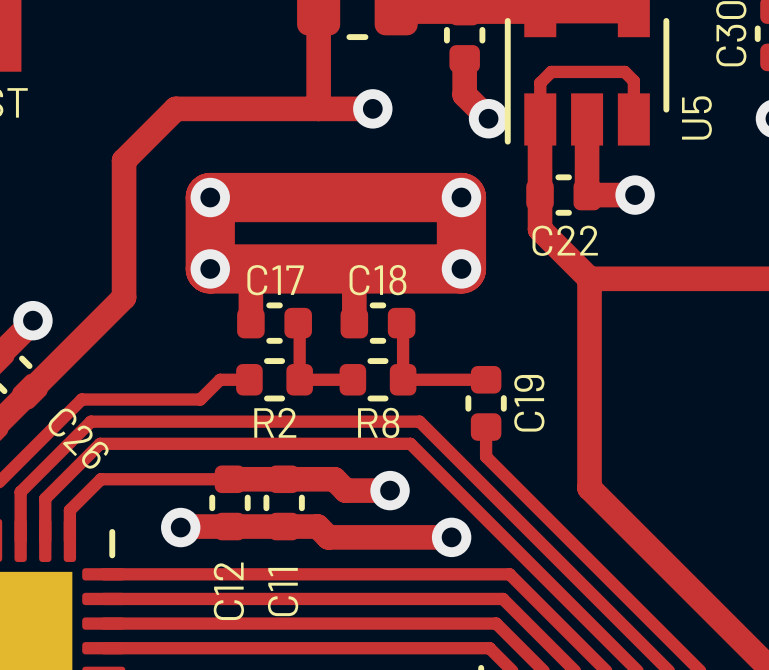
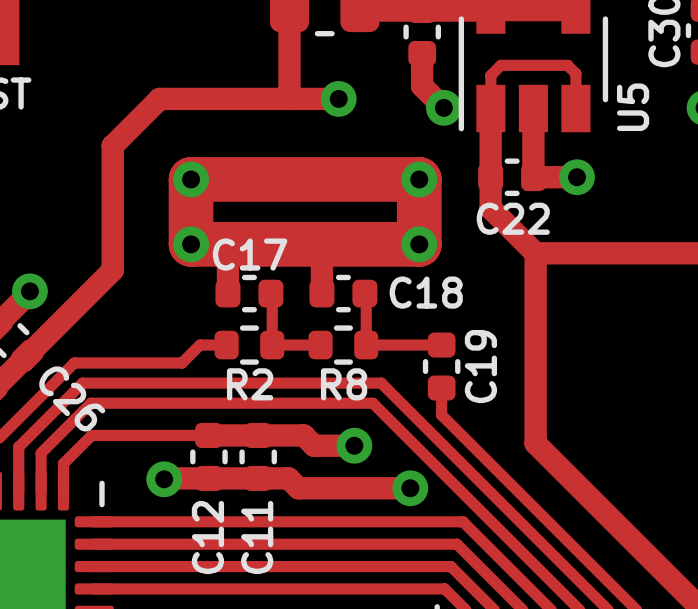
C18 name position: C18 (377, 280) -> C18 (426, 292)

